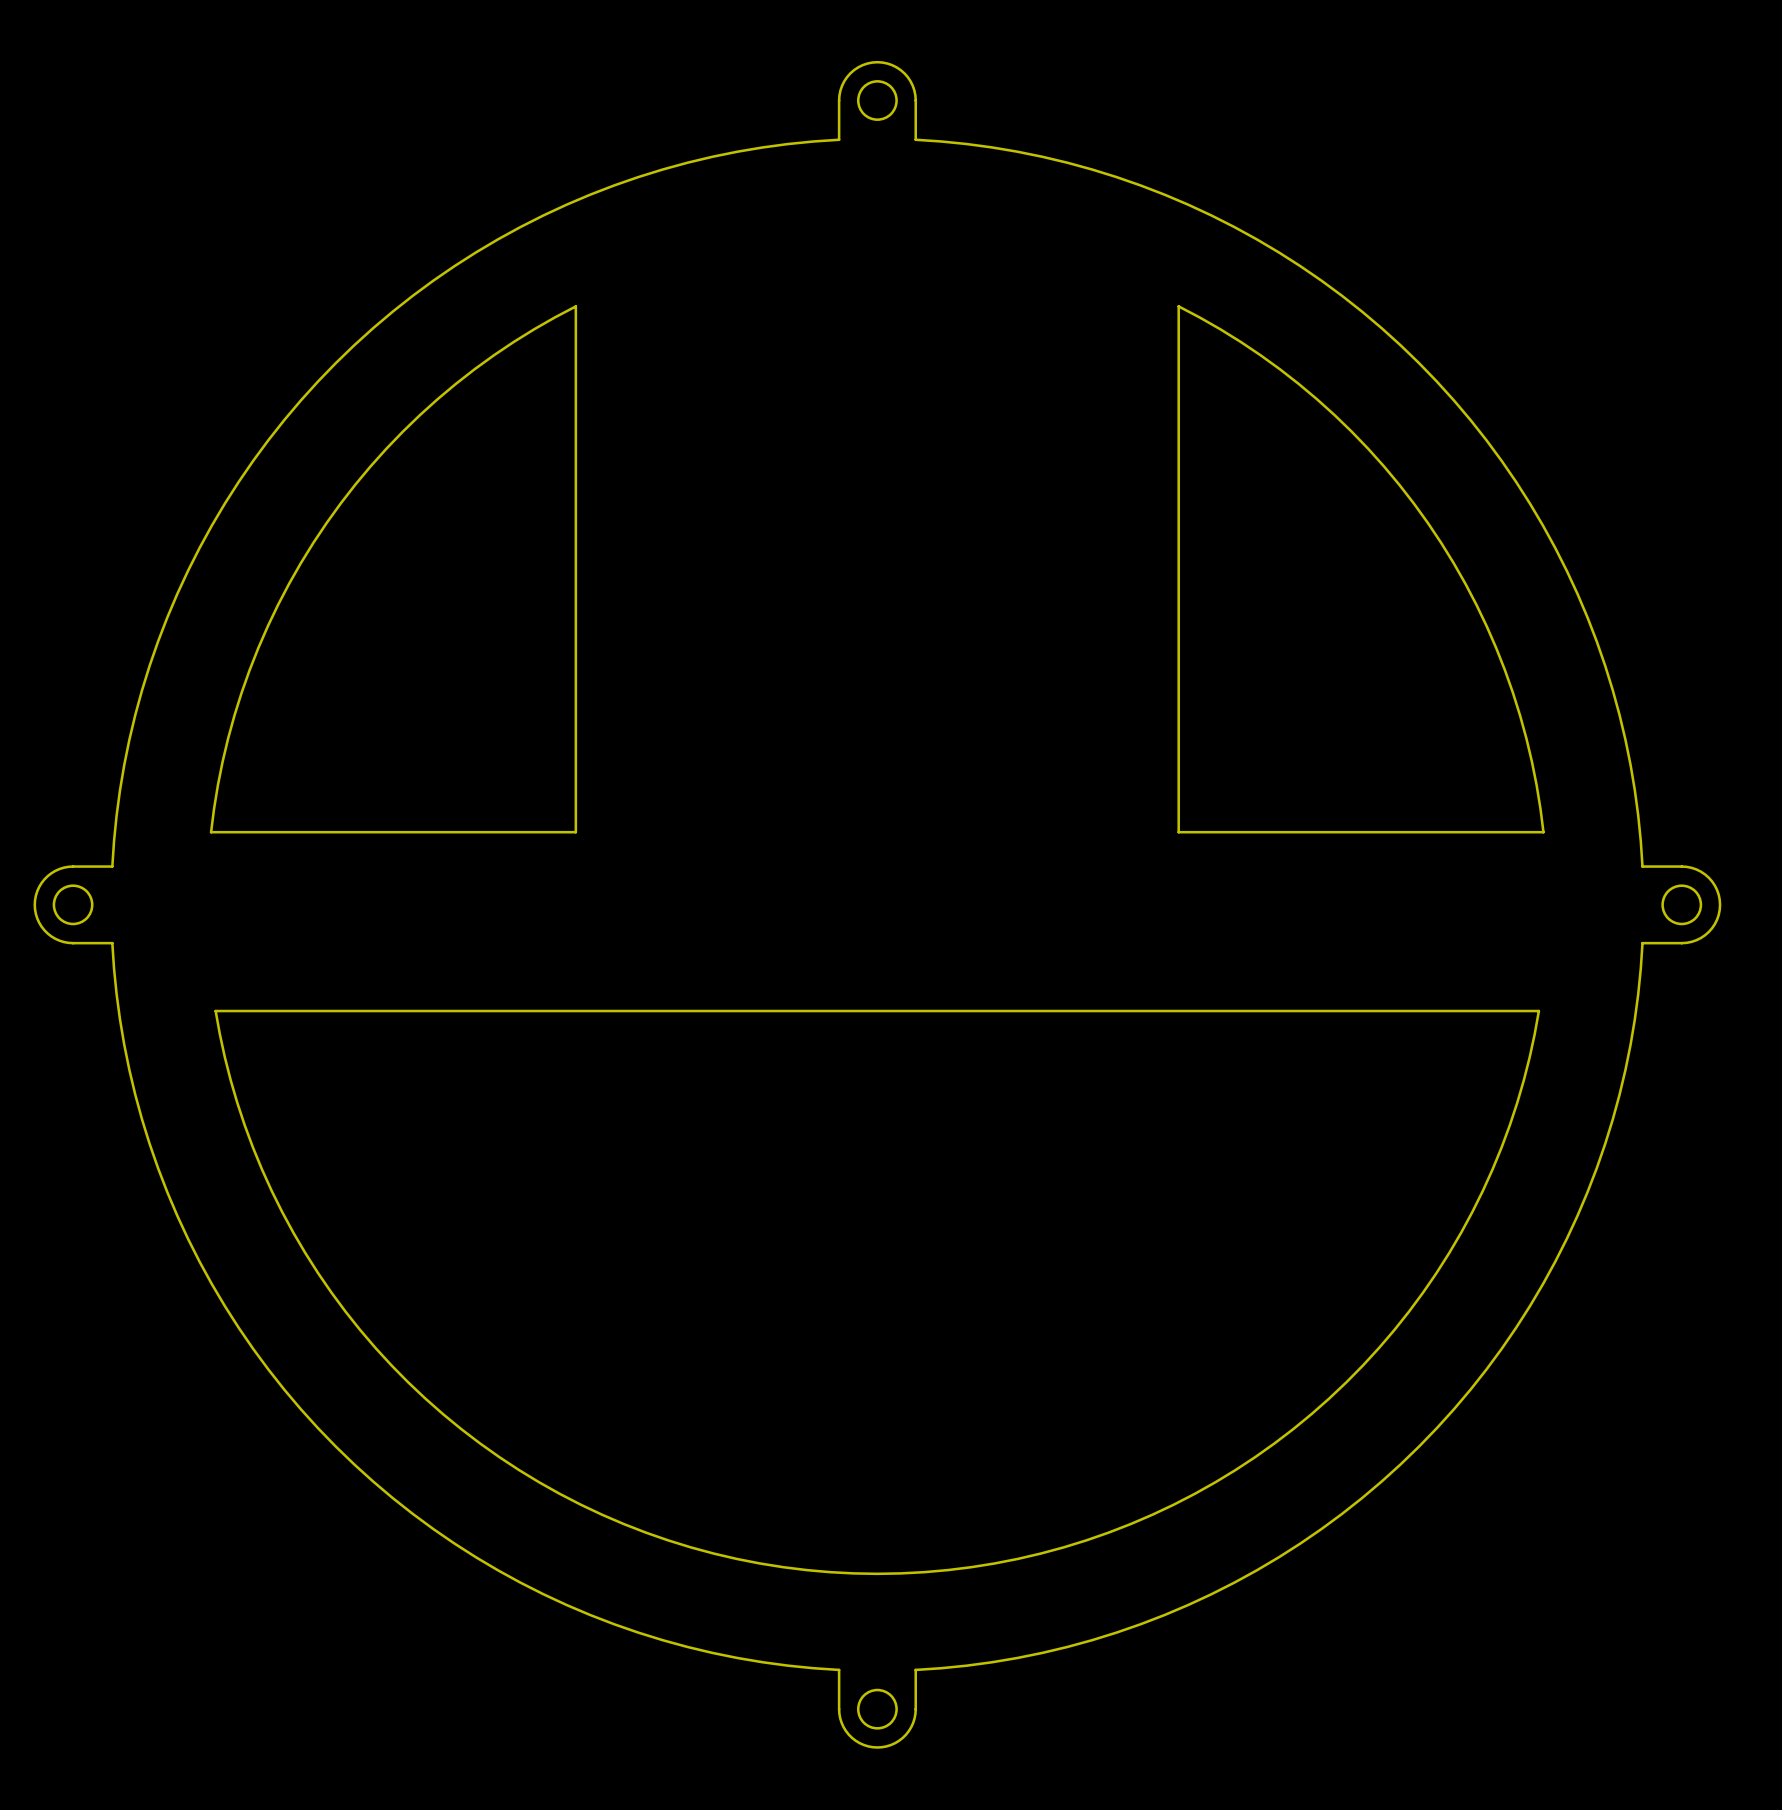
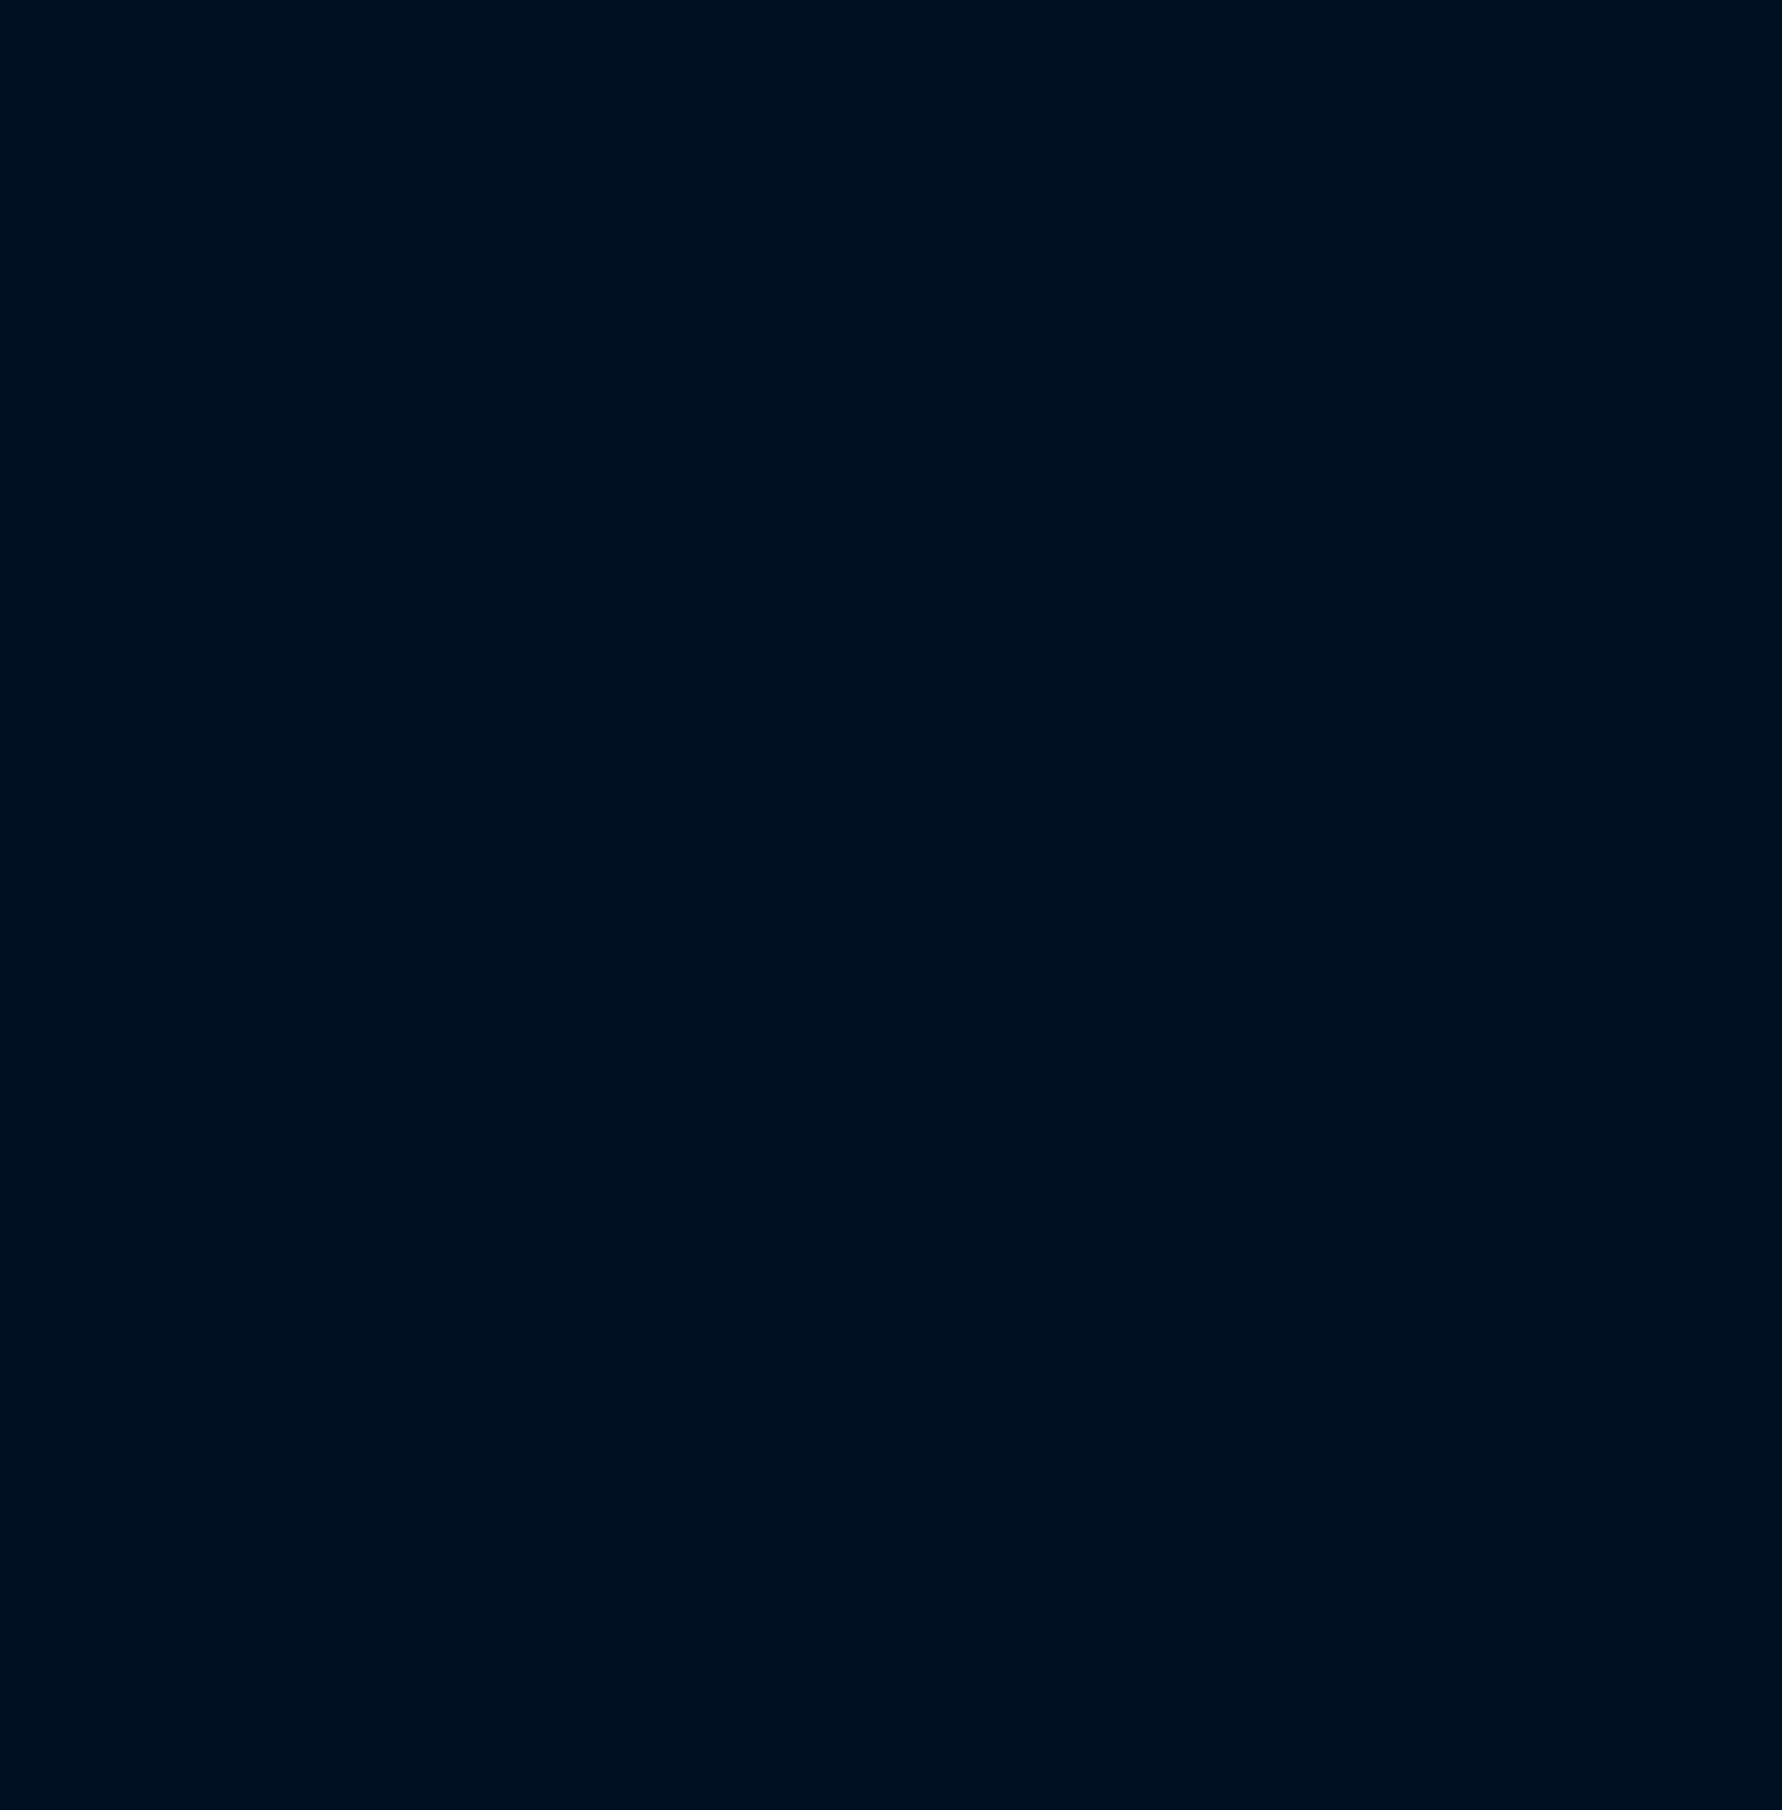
round board edge: [856, 80, 898, 121] -> none
board edge: (839, 100) (839, 139) (762, 147) (687, 162) (638, 177) (590, 194) (520, 227) (476, 252) (433, 280) (392, 311) (335, 363) (300, 400) (253, 460) (211, 525) (177, 594) (149, 665) (129, 739) (116, 815) (112, 866) (68, 866) (55, 870) (47, 876) (39, 887) (34, 904) (39, 922) (47, 933) (55, 938) (68, 942) (112, 943) (120, 1019) (135, 1094) (158, 1168) (177, 1215) (211, 1284) (253, 1348) (284, 1389) (335, 1446) (392, 1498) (433, 1529) (498, 1570) (566, 1605) (638, 1632) (712, 1652) (788, 1665) (839, 1669) (839, 1713) (843, 1726) (848, 1734) (859, 1743) (877, 1747) (895, 1743) (906, 1734) (911, 1726) (915, 1713) (915, 1669) (966, 1665) (1042, 1652) (1116, 1632) (1188, 1605) (1234, 1582) (1300, 1543) (1362, 1498) (1419, 1446) (1470, 1389) (1516, 1327) (1555, 1261) (1577, 1215) (1605, 1143) (1619, 1094) (1634, 1019) (1642, 943) (1686, 942) (1700, 938) (1714, 924) (1720, 904) (1714, 885) (1700, 871) (1686, 866) (1642, 866) (1638, 815) (1625, 739) (1605, 665) (1577, 594) (1542, 525) (1501, 460) (1454, 400) (1400, 345) (1362, 311) (1300, 266) (1234, 227) (1164, 194) (1116, 177) (1042, 156) (992, 147) (915, 139) (914, 90) (904, 73) (892, 65) (877, 62) (858, 67) (844, 81) (839, 100) -> none
board edge: (575, 306) (575, 832) (211, 832) (217, 785) (228, 738) (249, 670) (278, 604) (300, 563) (326, 522) (370, 466) (402, 431) (437, 399) (474, 369) (513, 341) (575, 306) -> none
board edge: (1178, 306) (1178, 832) (1543, 832) (1531, 761) (1520, 715) (1505, 670) (1486, 626) (1465, 583) (1427, 522) (1384, 466) (1351, 431) (1316, 399) (1260, 355) (1220, 329) (1178, 306) -> none
round board edge: [52, 884, 94, 926] -> none
round board edge: [1661, 884, 1703, 926] -> none
board edge: (215, 1011) (1538, 1011) (1523, 1080) (1509, 1125) (1482, 1190) (1461, 1232) (1436, 1273) (1394, 1330) (1363, 1365) (1311, 1414) (1274, 1443) (1215, 1482) (1152, 1514) (1108, 1532) (1063, 1547) (994, 1563) (948, 1570) (877, 1573) (806, 1570) (759, 1563) (690, 1547) (645, 1532) (580, 1504) (539, 1482) (499, 1457) (442, 1414) (391, 1365) (360, 1330) (331, 1292) (293, 1232) (271, 1190) (244, 1125) (230, 1080) (215, 1011) -> none
round board edge: [856, 1688, 898, 1730] -> none

